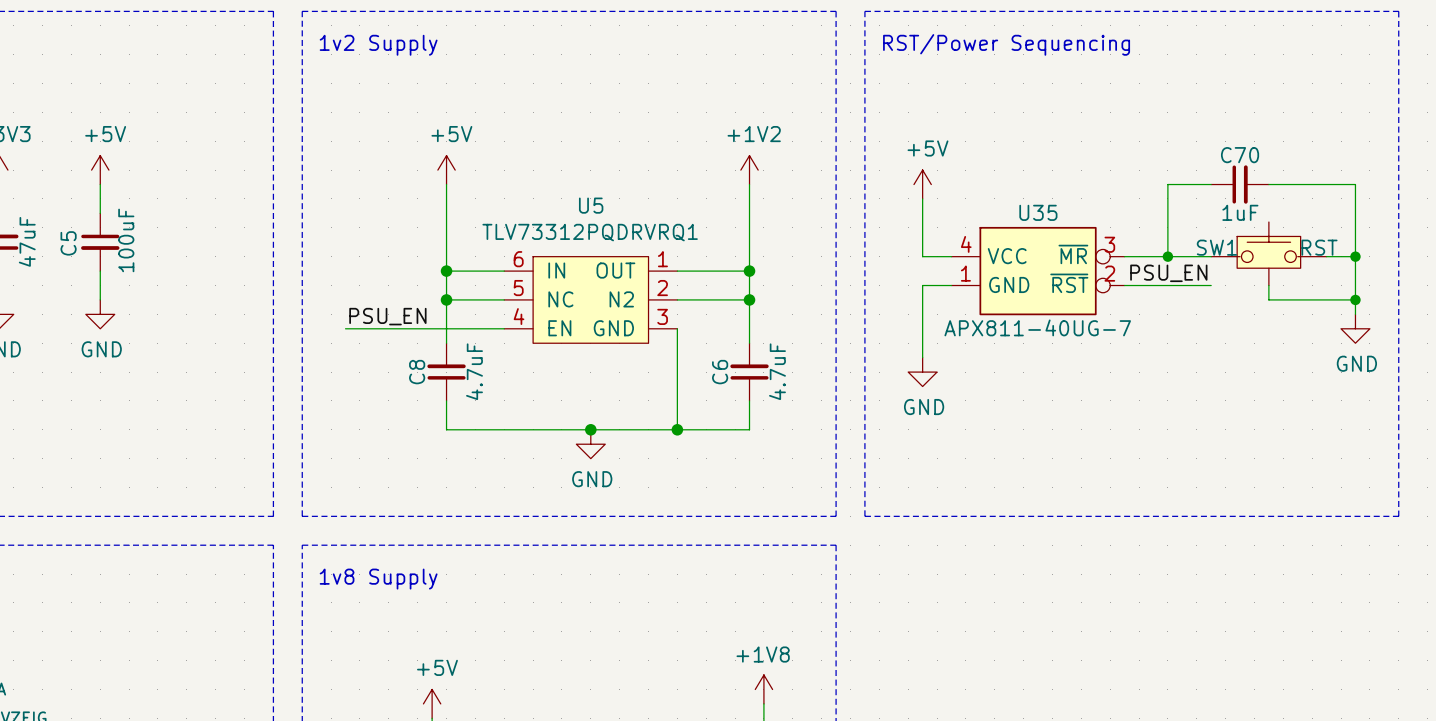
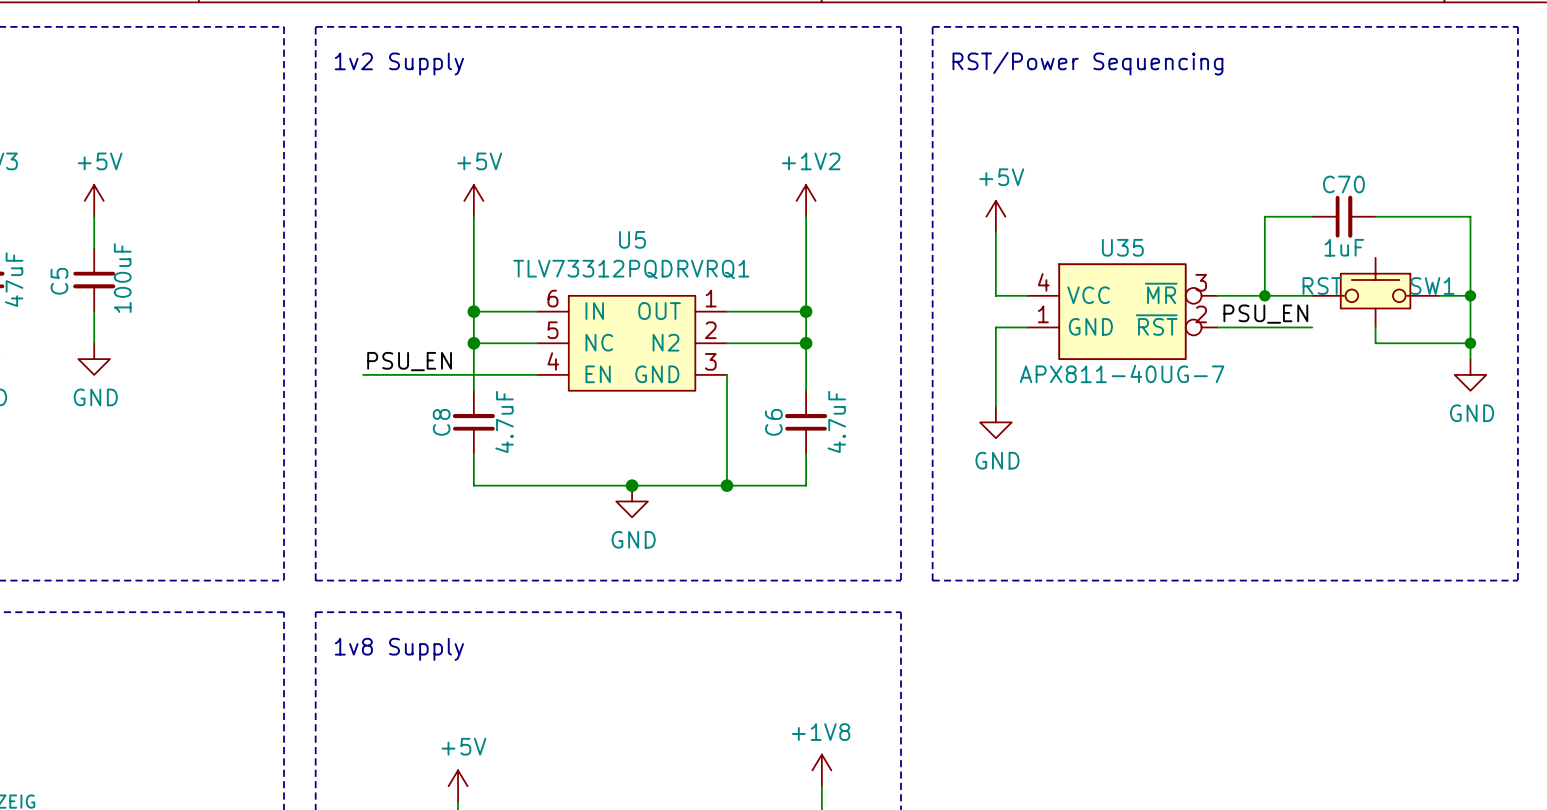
SW1 name position: SW1 (1216, 247) -> SW1 (1432, 285)
SW1 value position: RST (1319, 247) -> RST (1322, 285)

